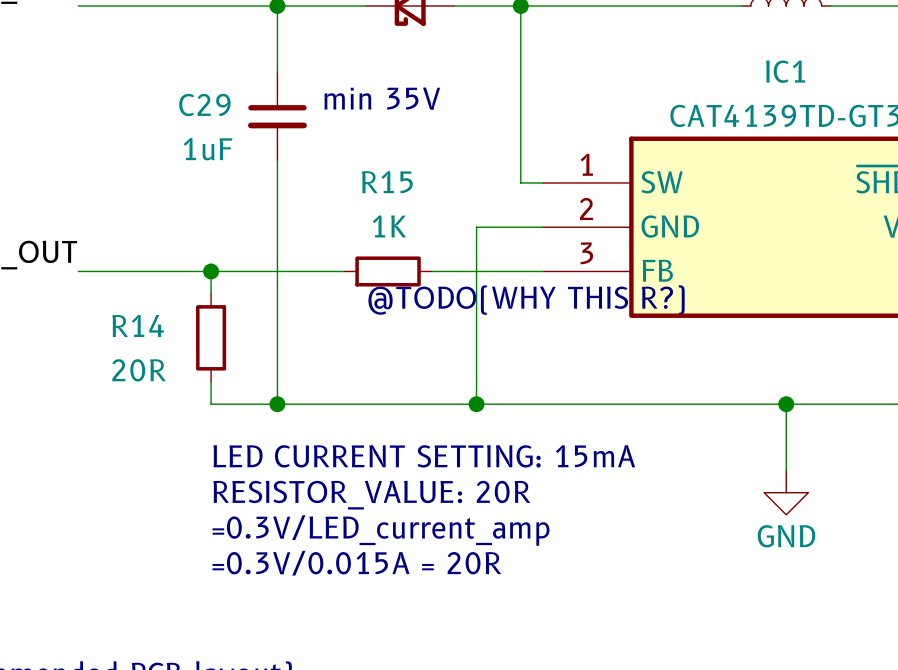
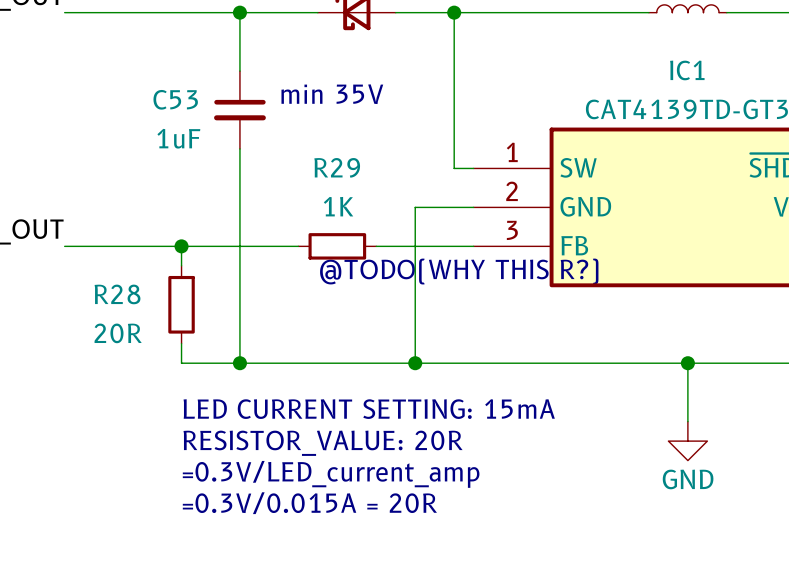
C29 name: C29 (204, 104) -> C53 (175, 99)
R15 name: R15 (387, 182) -> R29 (337, 167)
R14 name: R14 (138, 325) -> R28 (117, 294)

